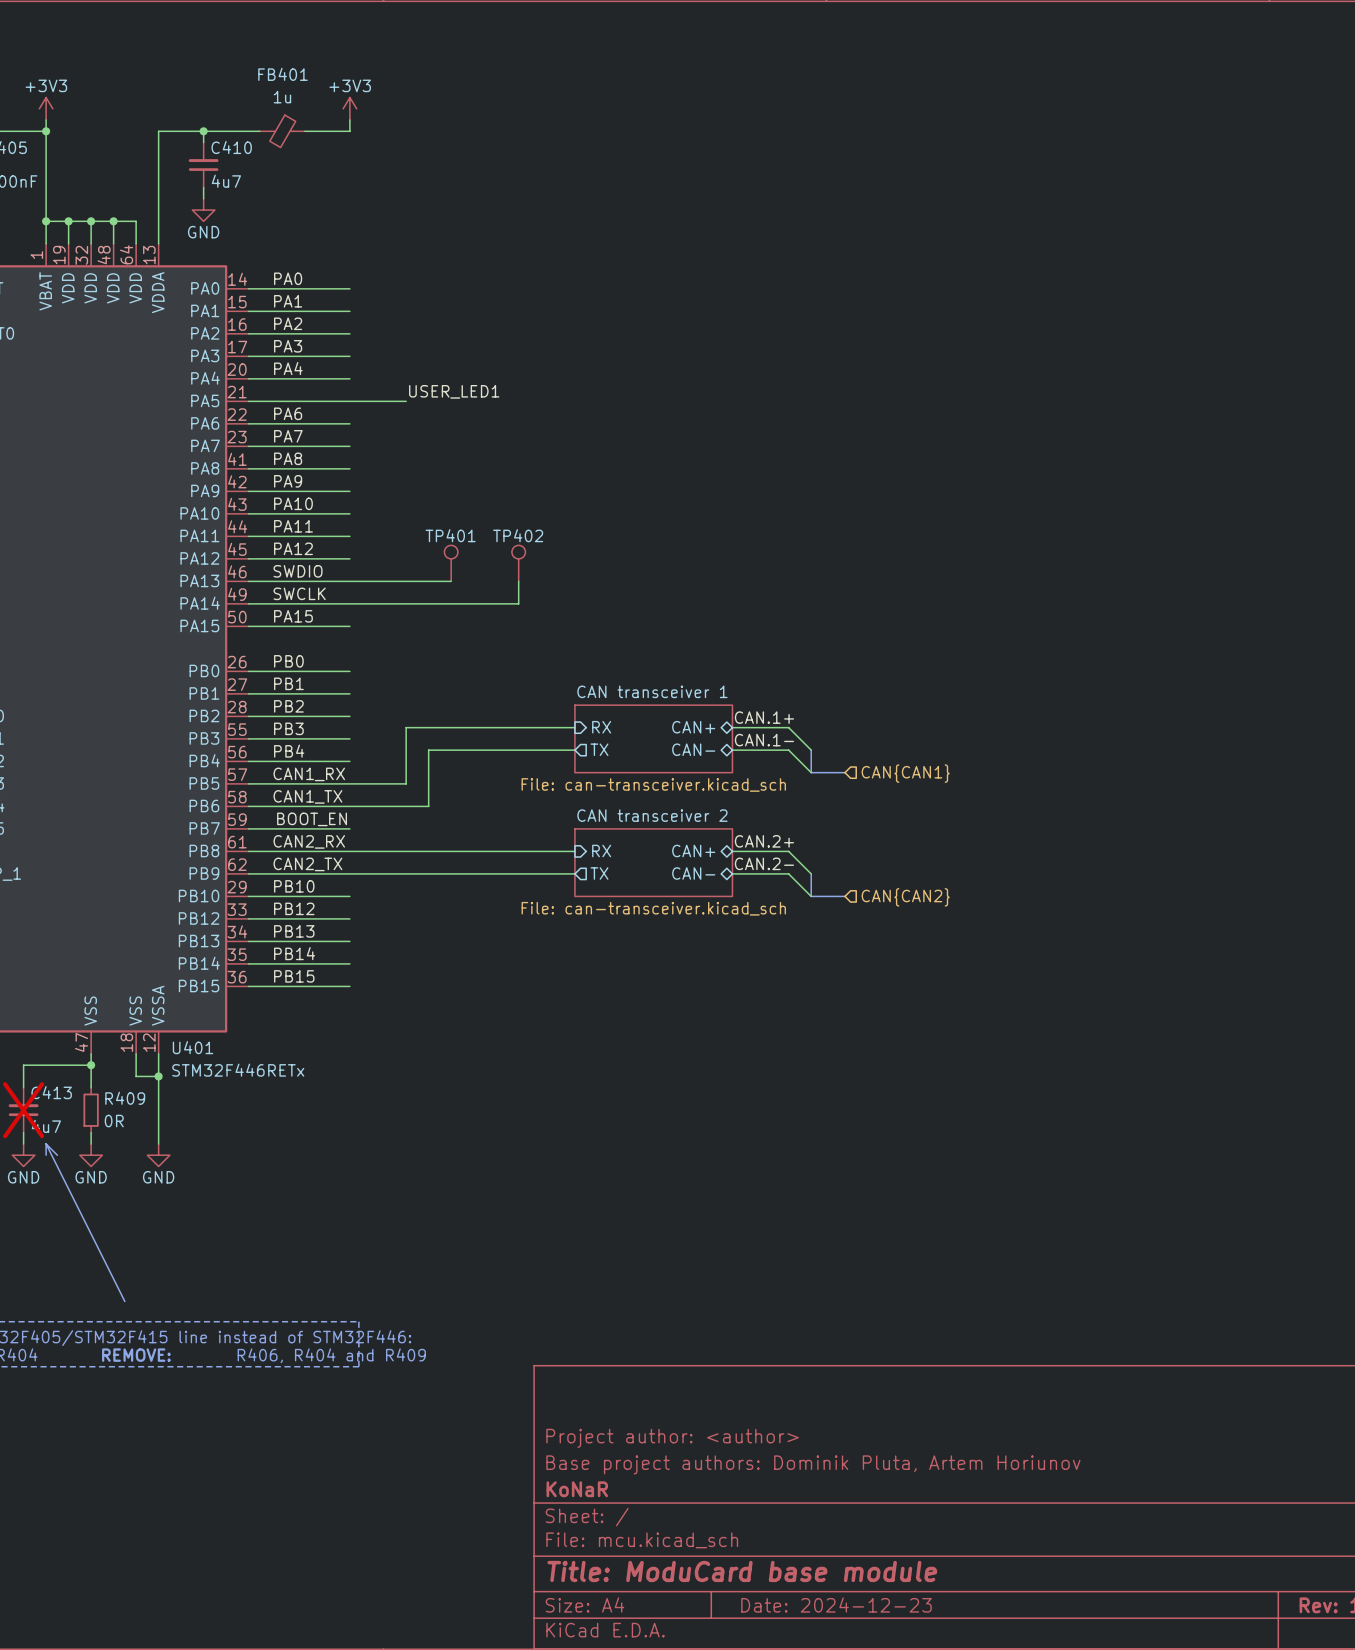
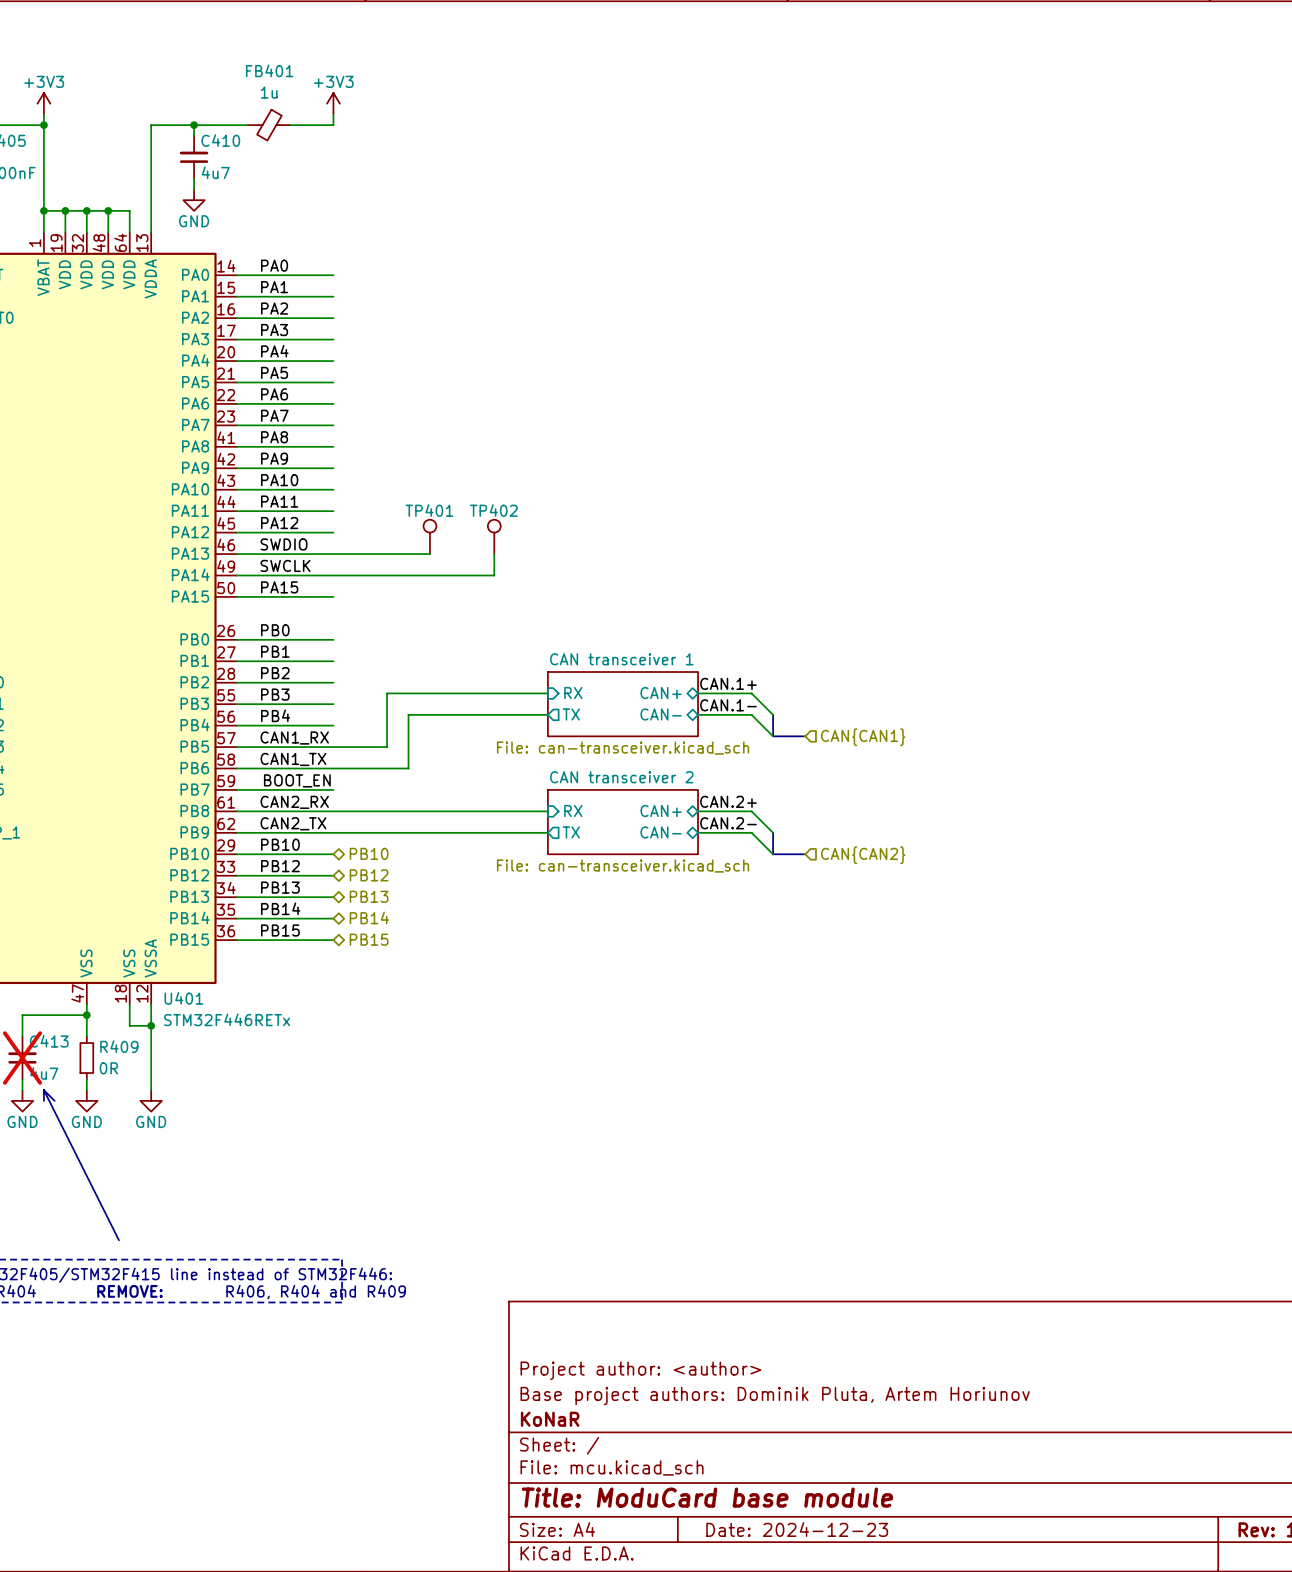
label: none -> PA5 (274, 372)
label: USER_LED1 (454, 391) -> none
wire: (349, 401) (406, 401) -> none
hierarchical label: none -> PB10 (369, 853)
hierarchical label: none -> PB12 (369, 875)
hierarchical label: none -> PB13 (369, 896)
hierarchical label: none -> PB14 (369, 917)
hierarchical label: none -> PB15 (369, 939)

